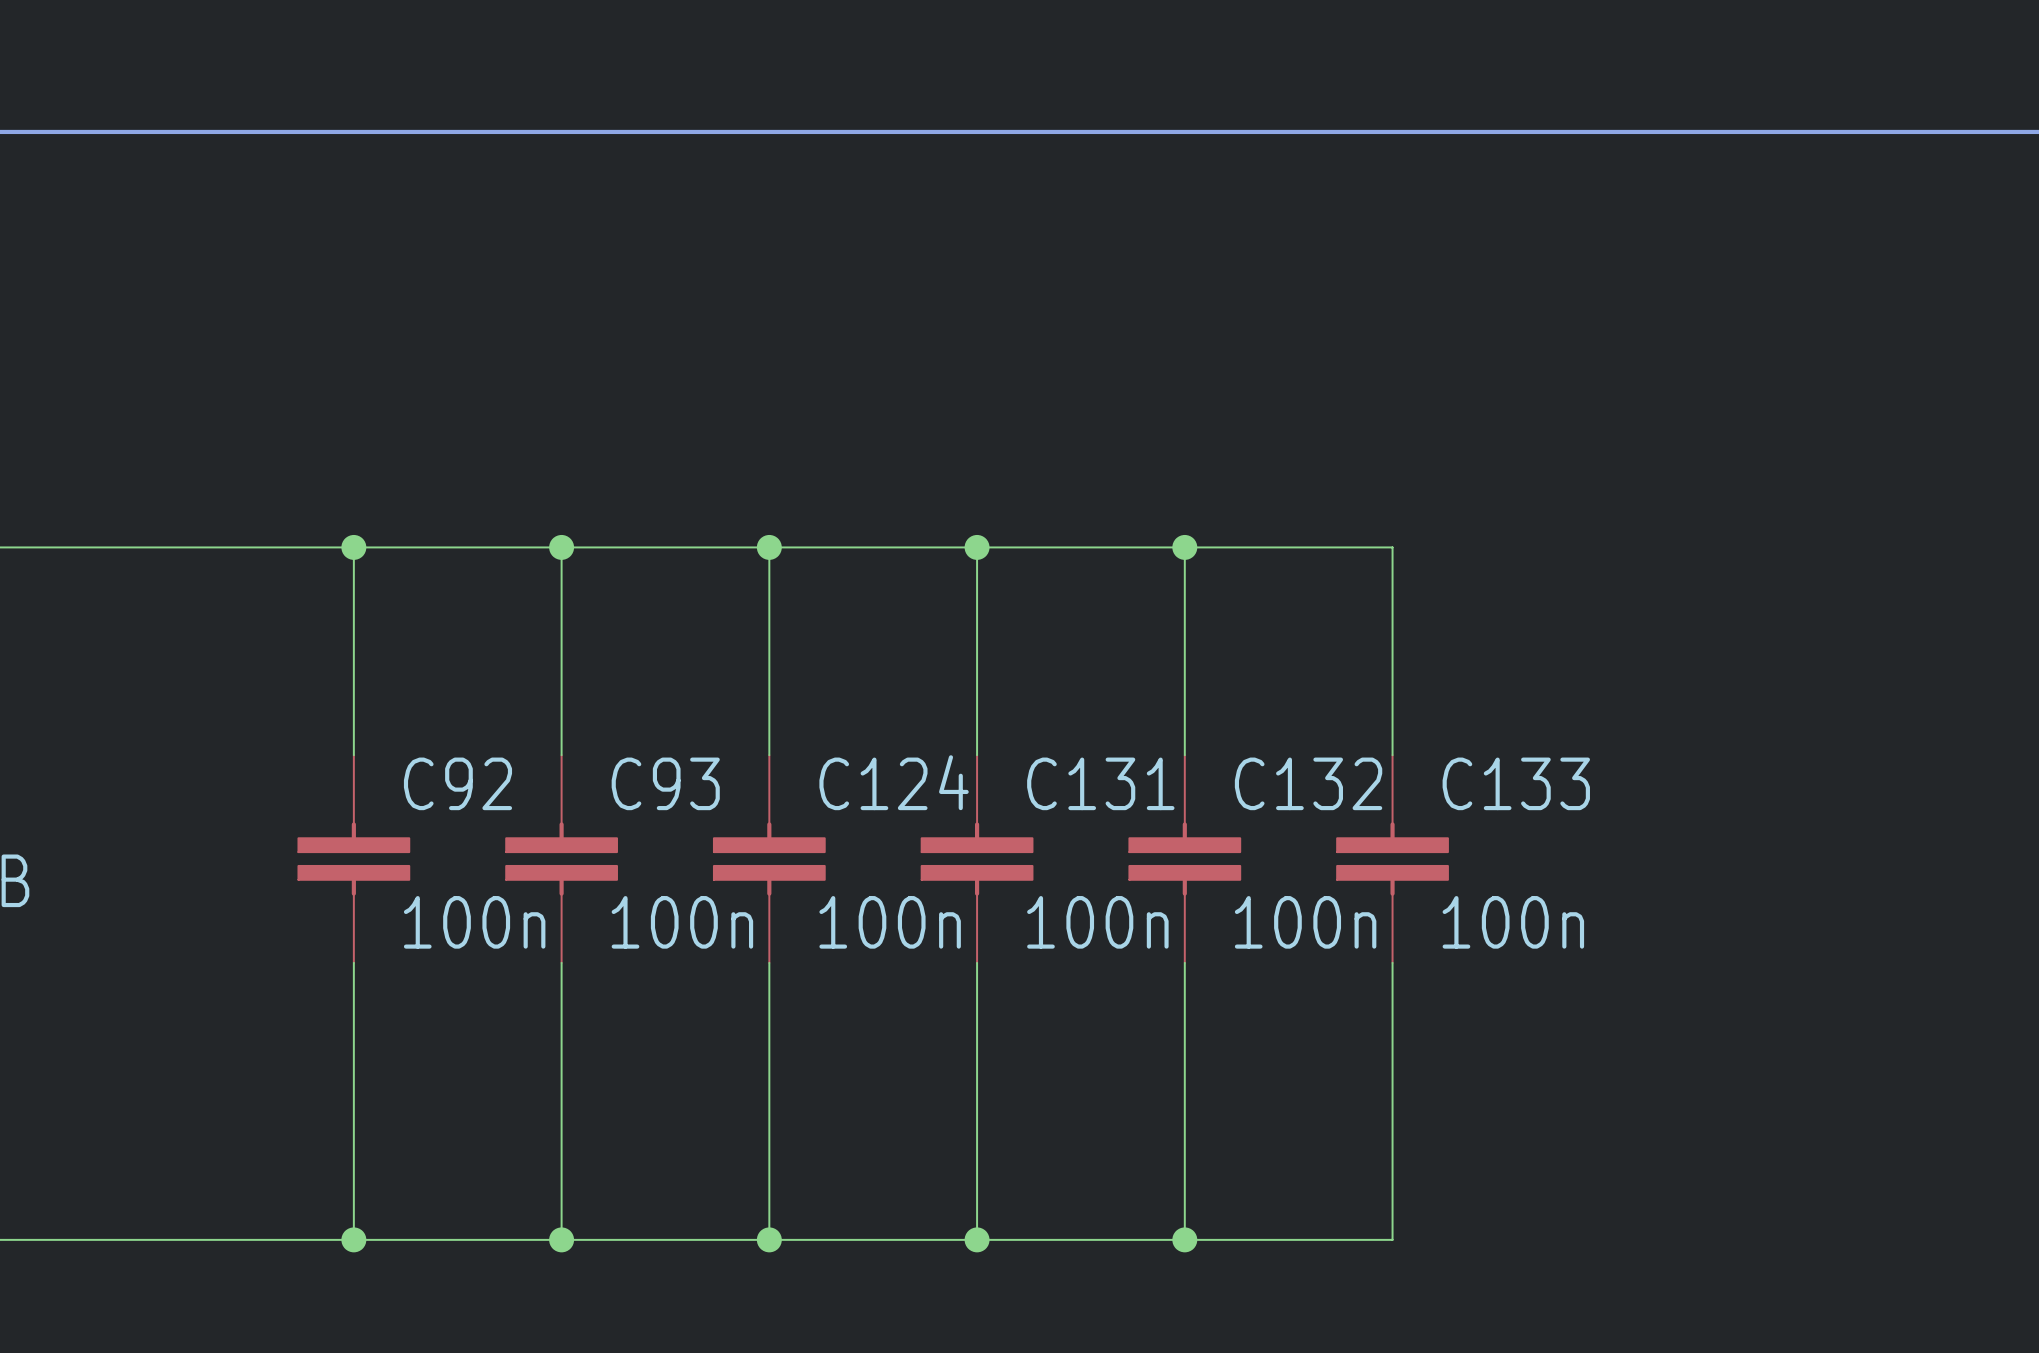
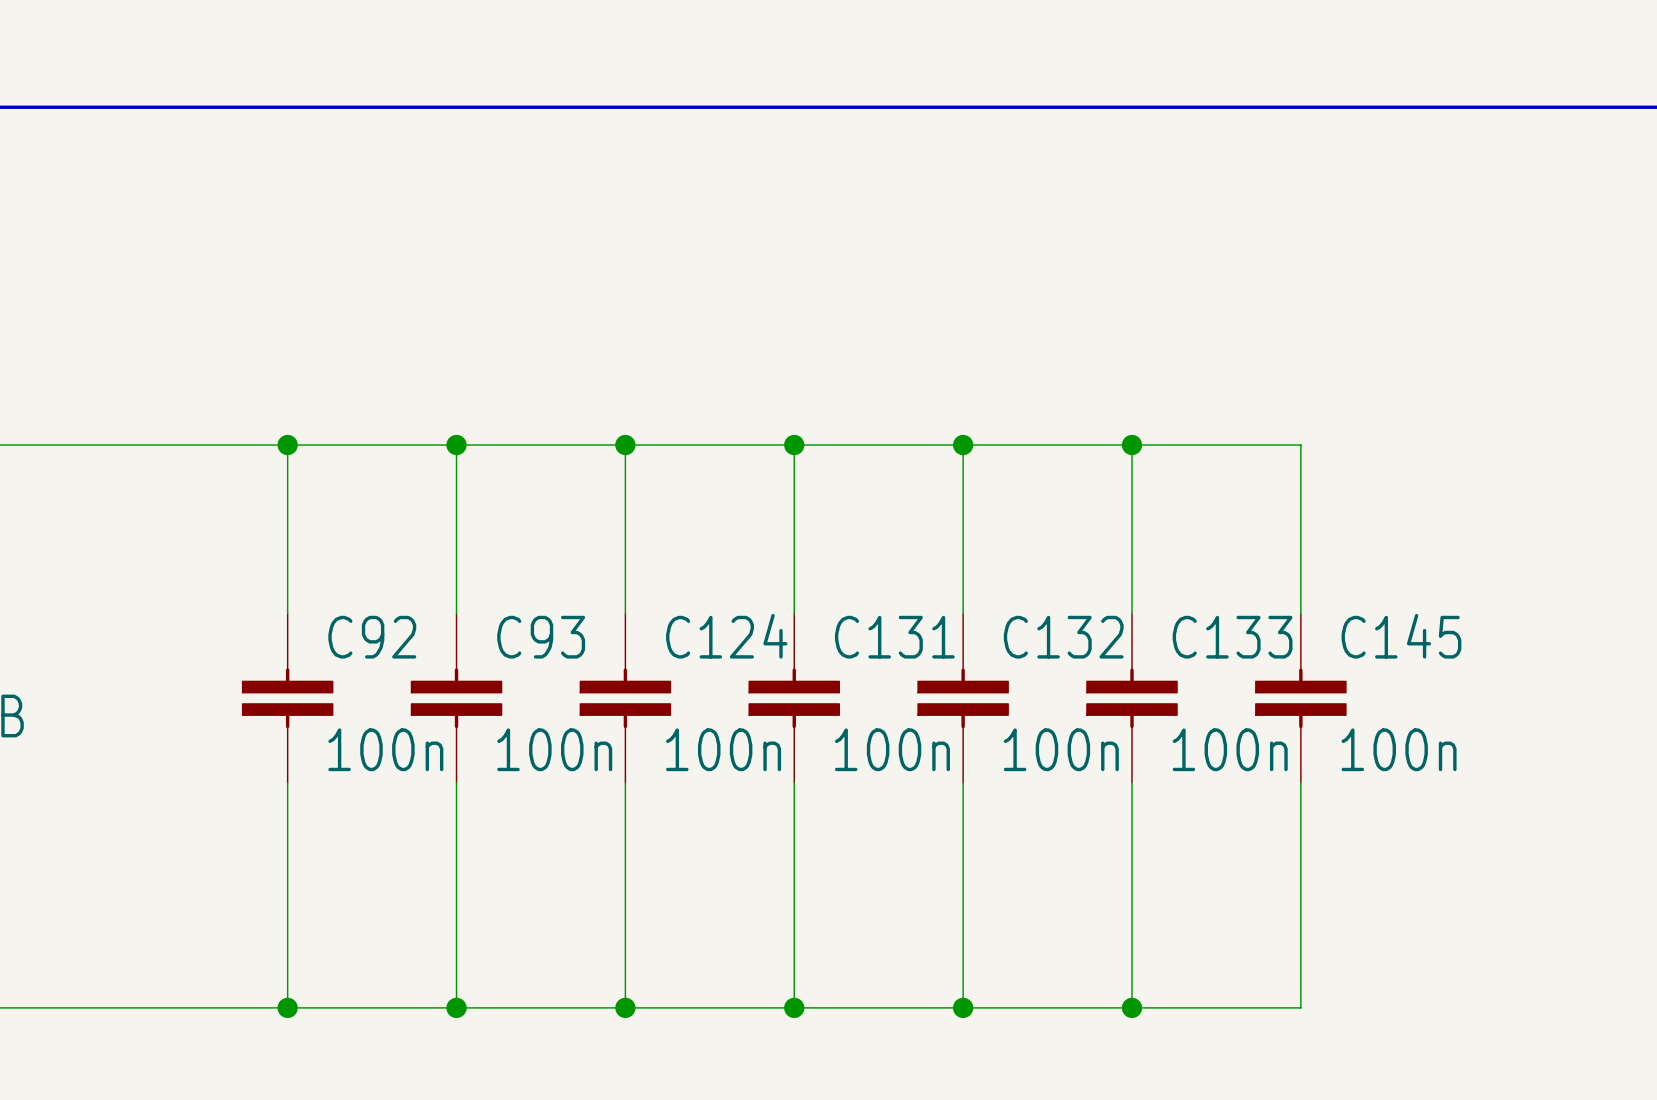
wire: none -> (1131, 445) (1300, 445) (1300, 613)
junction: none -> (1131, 445)
C145: none -> 100n (1300, 698)
wire: none -> (1300, 782) (1300, 1007) (1131, 1007)
junction: none -> (1131, 1007)

